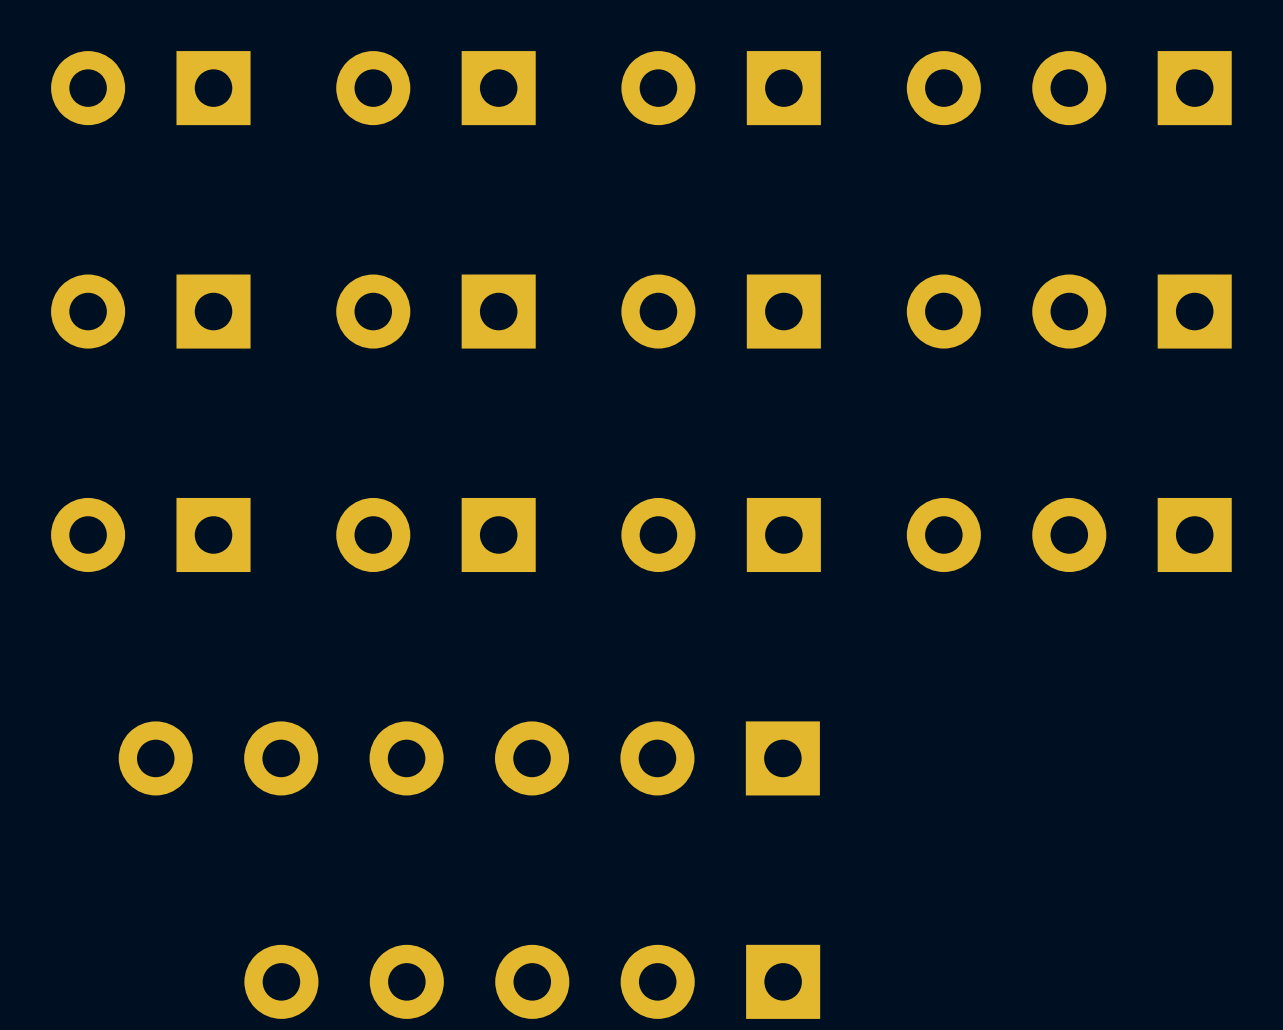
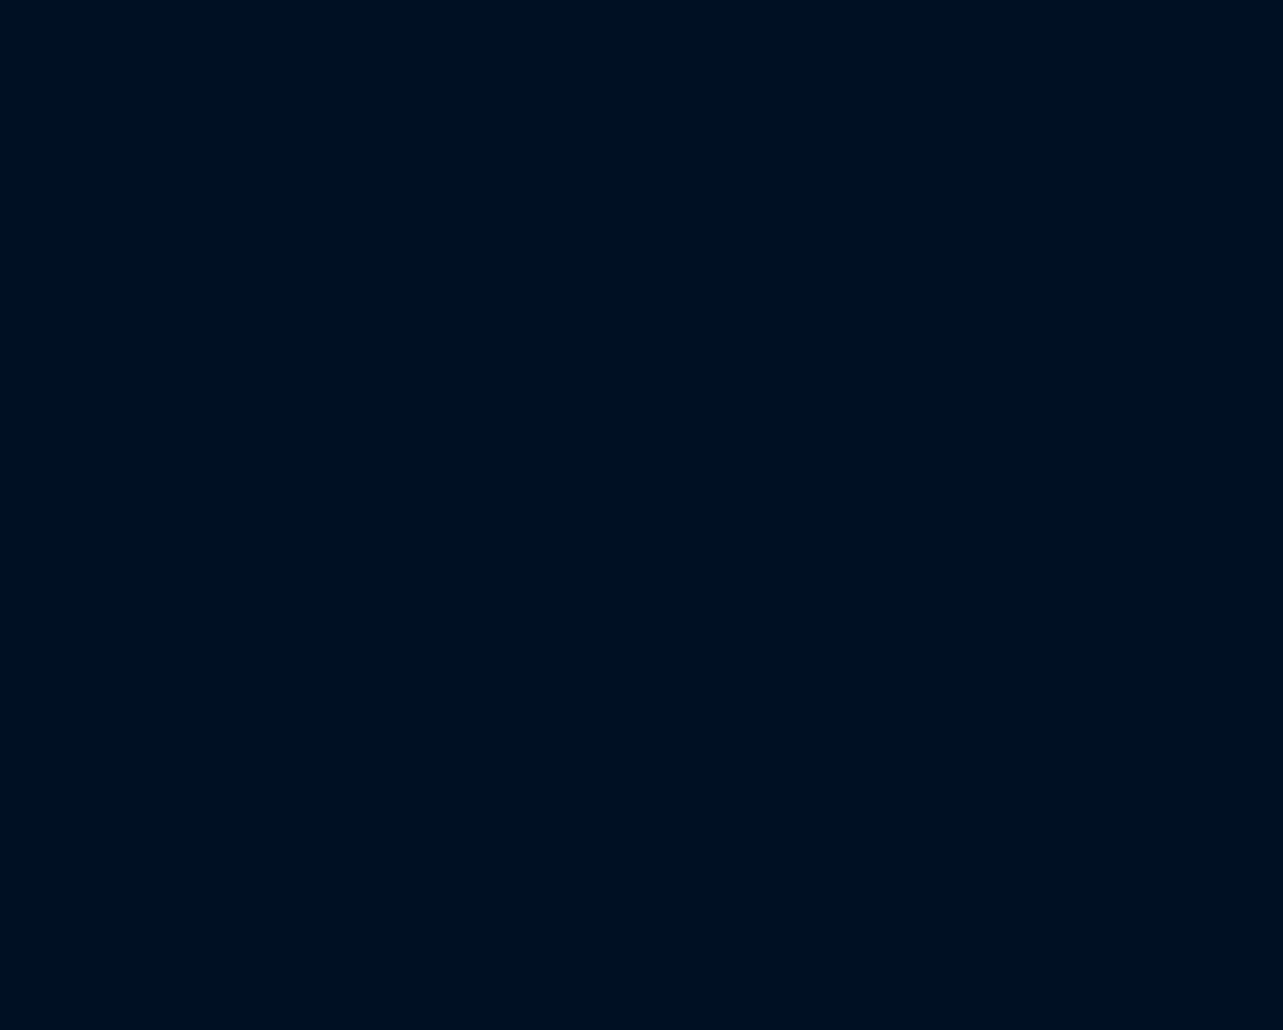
part: (150, 88) -> none
part: (435, 88) -> none
part: (721, 88) -> none
part: (1069, 88) -> none
part: (150, 311) -> none
part: (435, 311) -> none
part: (721, 311) -> none
part: (1069, 311) -> none
part: (150, 534) -> none
part: (435, 534) -> none
part: (721, 534) -> none
part: (1069, 534) -> none
part: (469, 758) -> none
part: (532, 981) -> none

